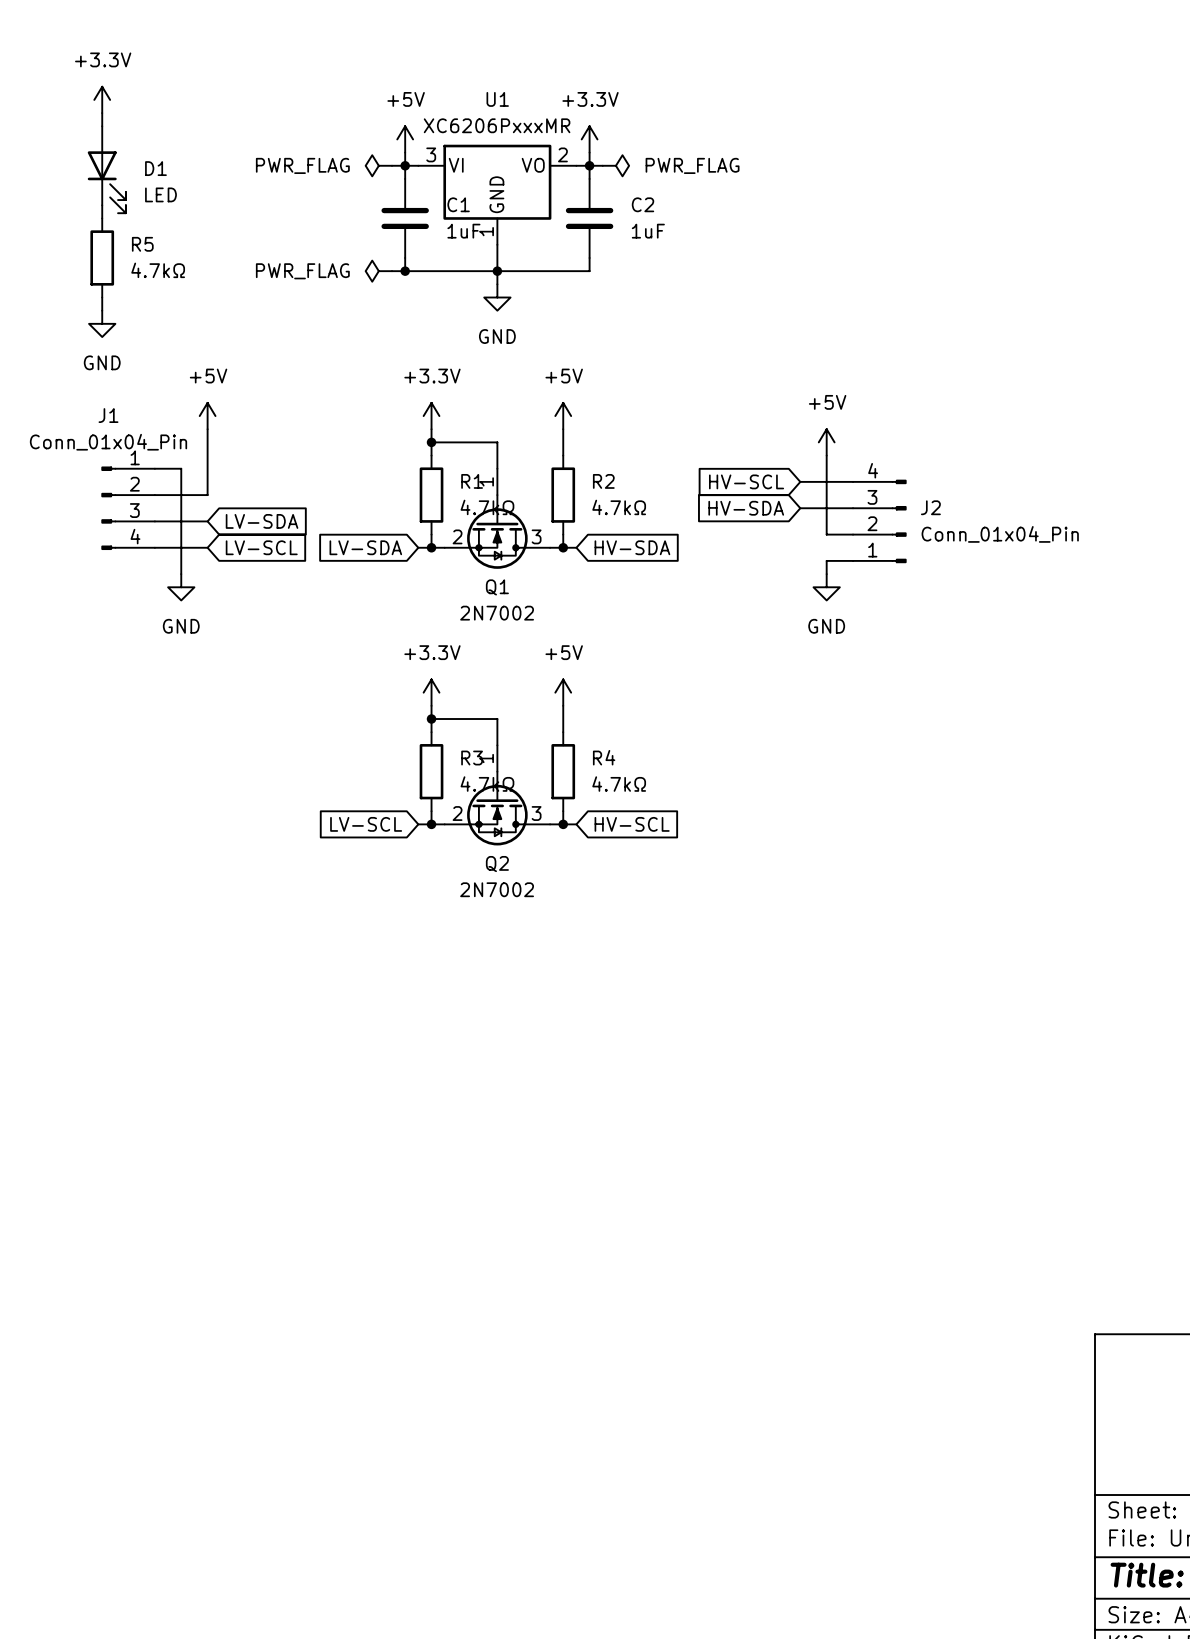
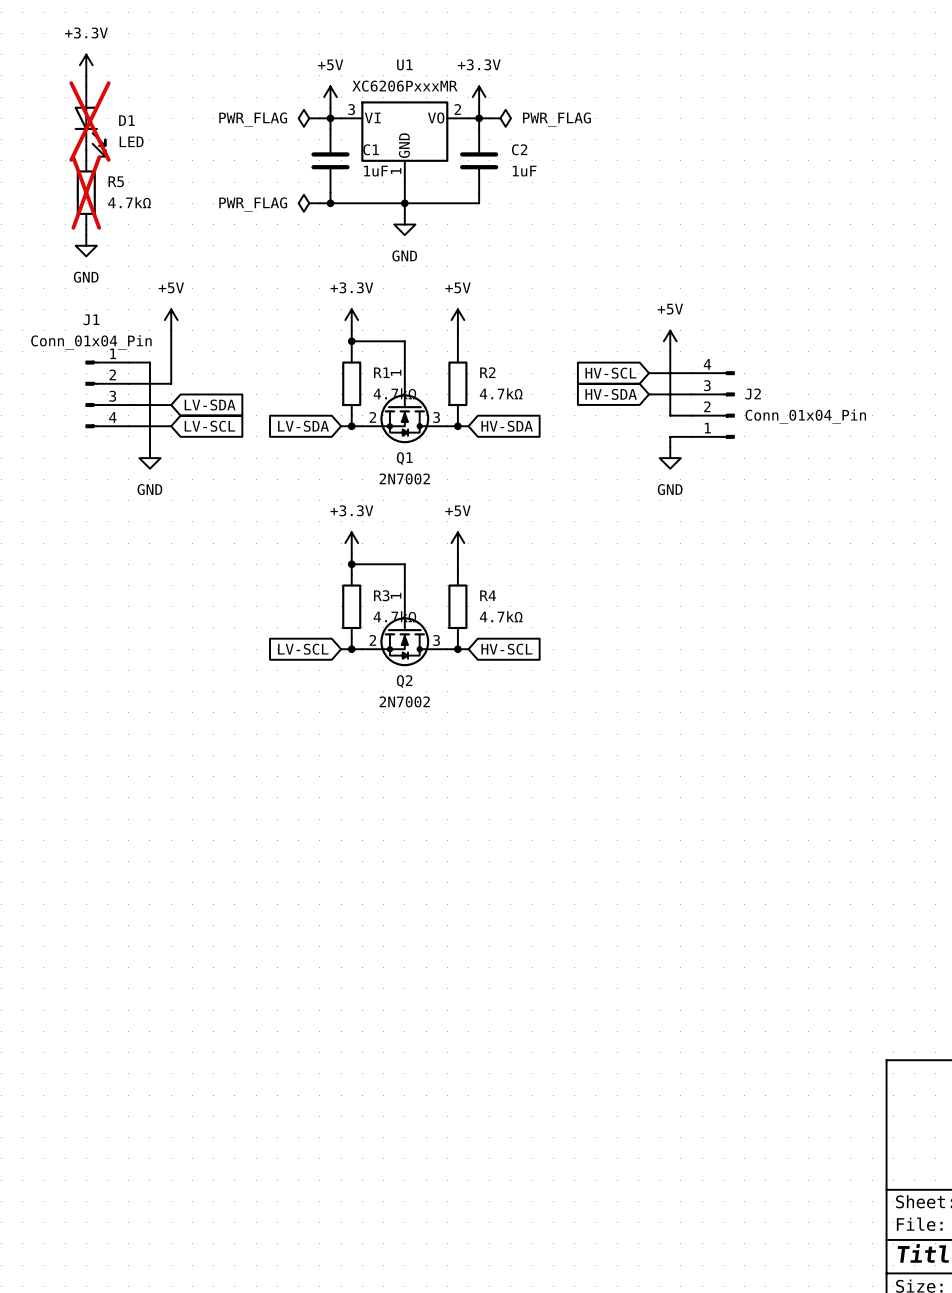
D1 do-not-place cross: none -> (90, 121)
R5 do-not-place cross: none -> (86, 192)

